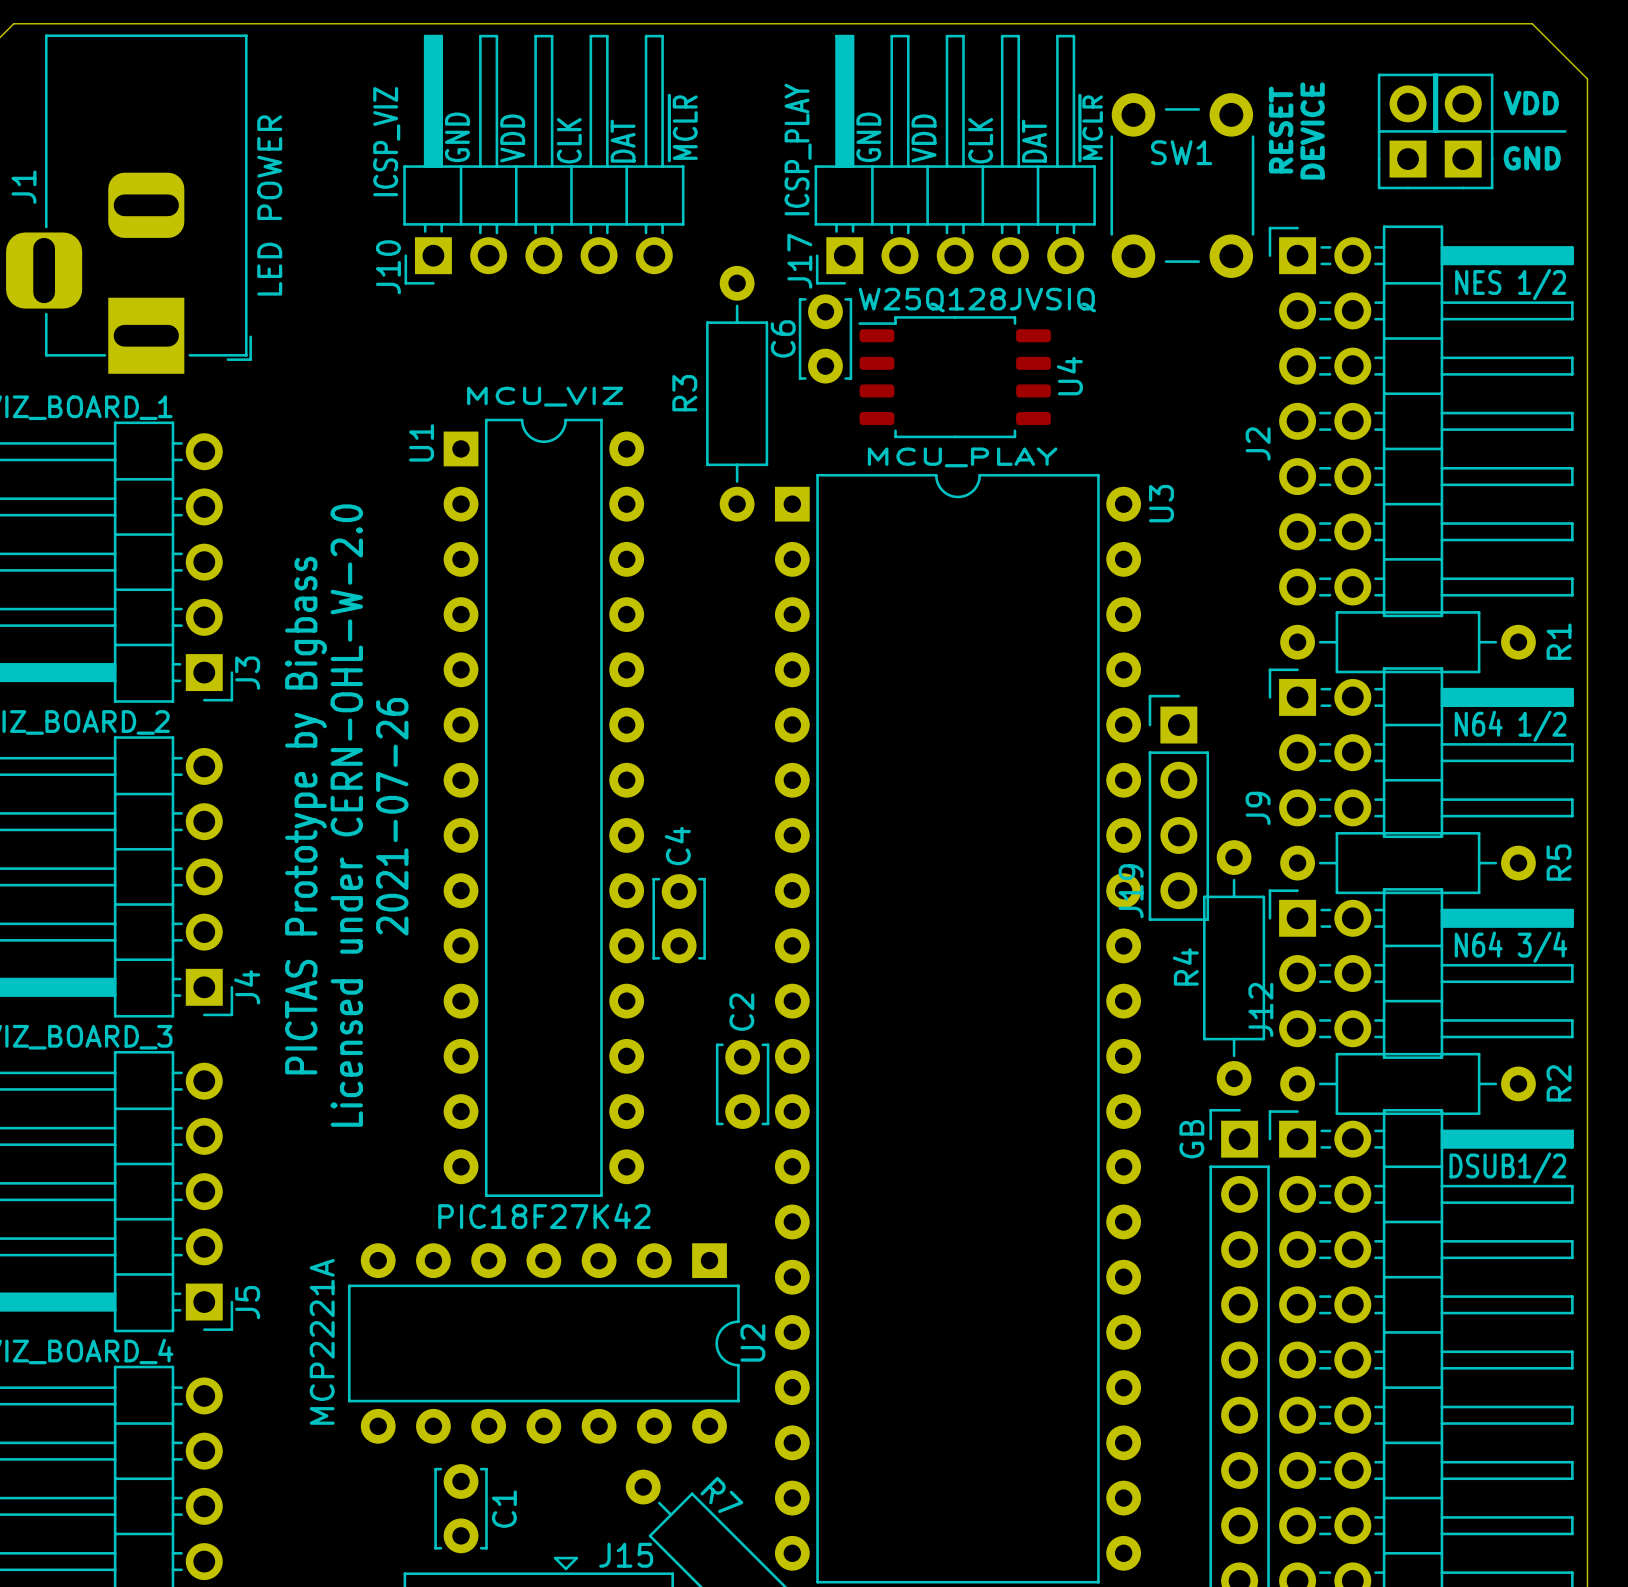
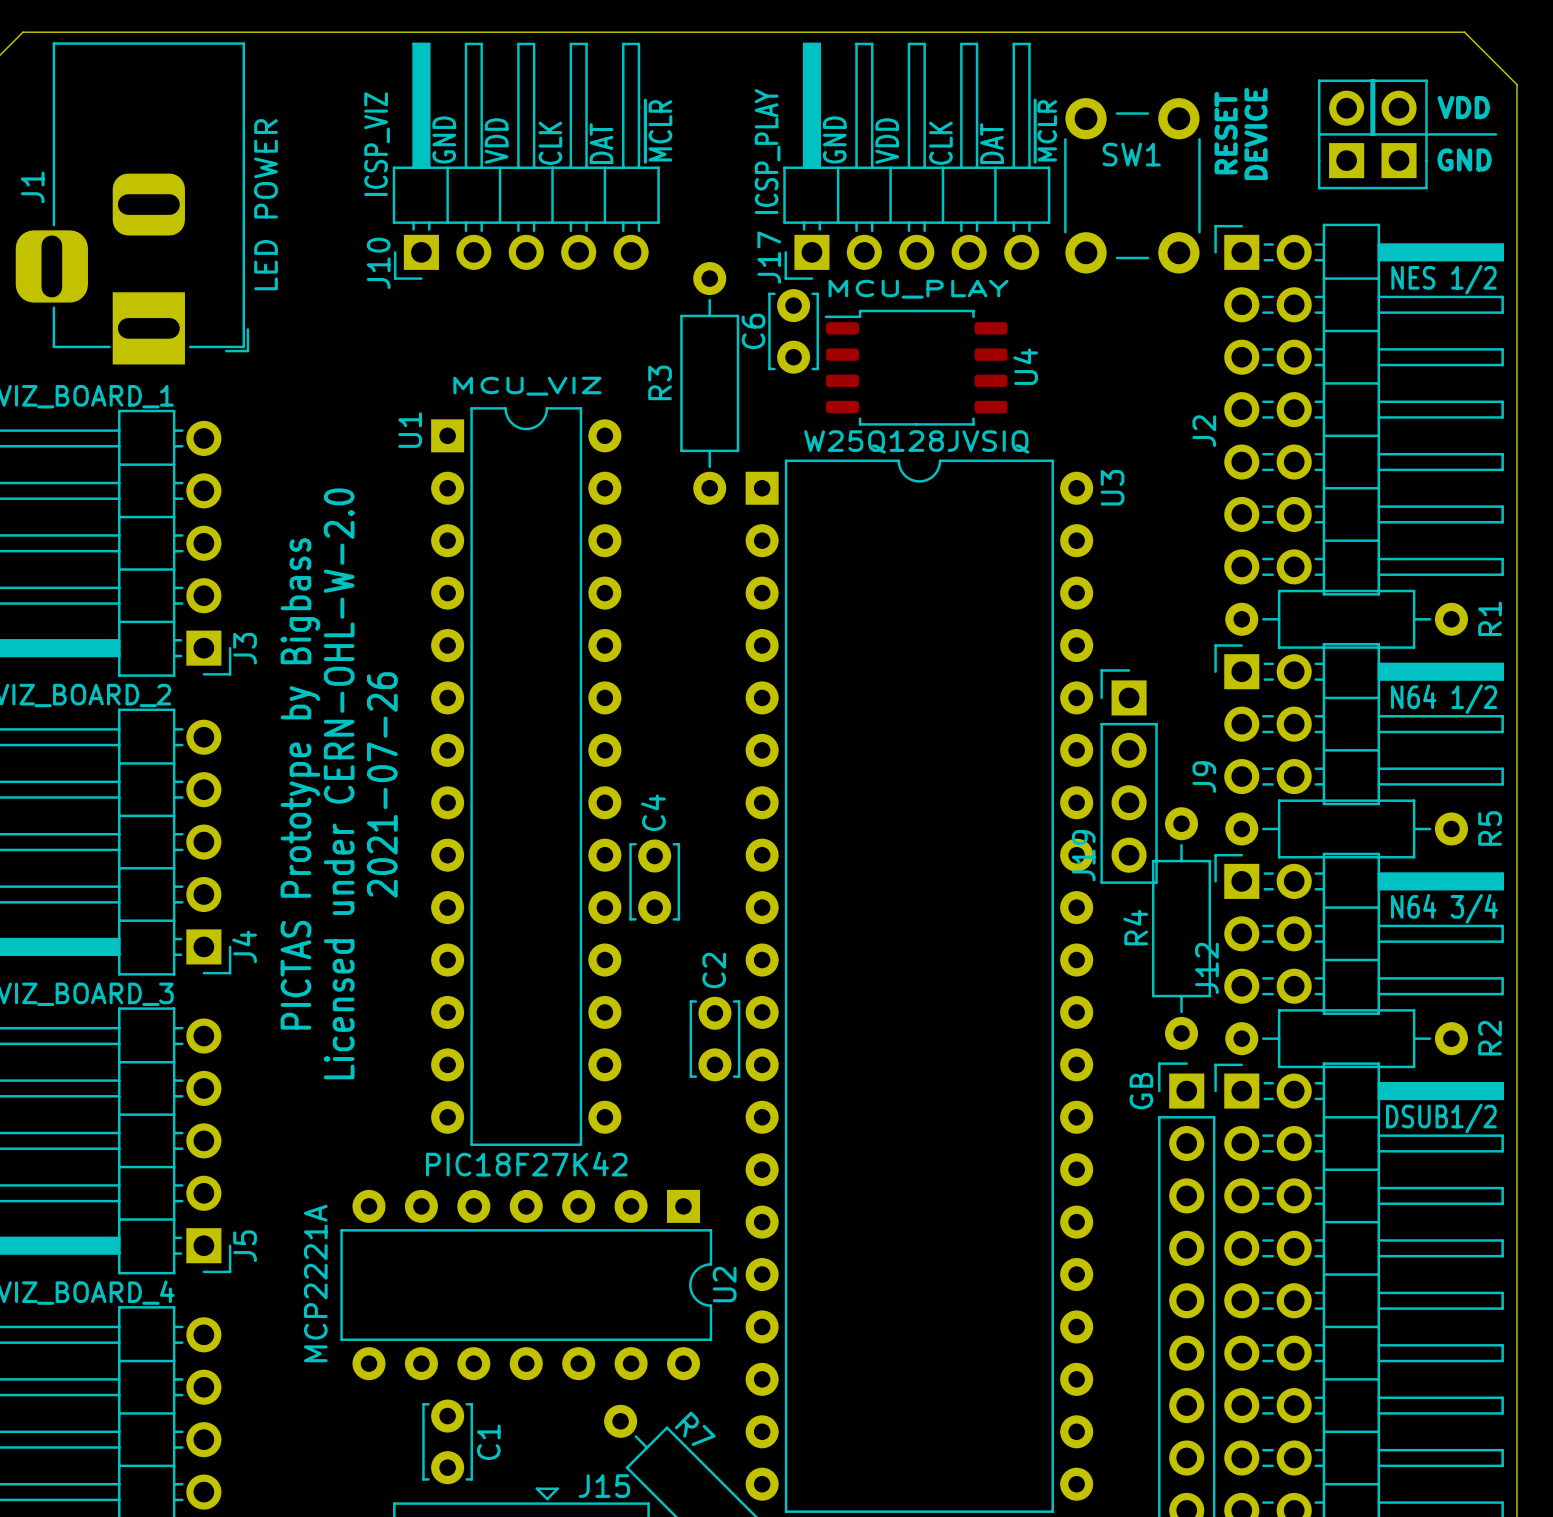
U4 value position: W25Q128JVSIQ (977, 300) -> W25Q128JVSIQ (916, 441)
text position: MCU_PLAY (962, 457) -> MCU_PLAY (918, 289)

